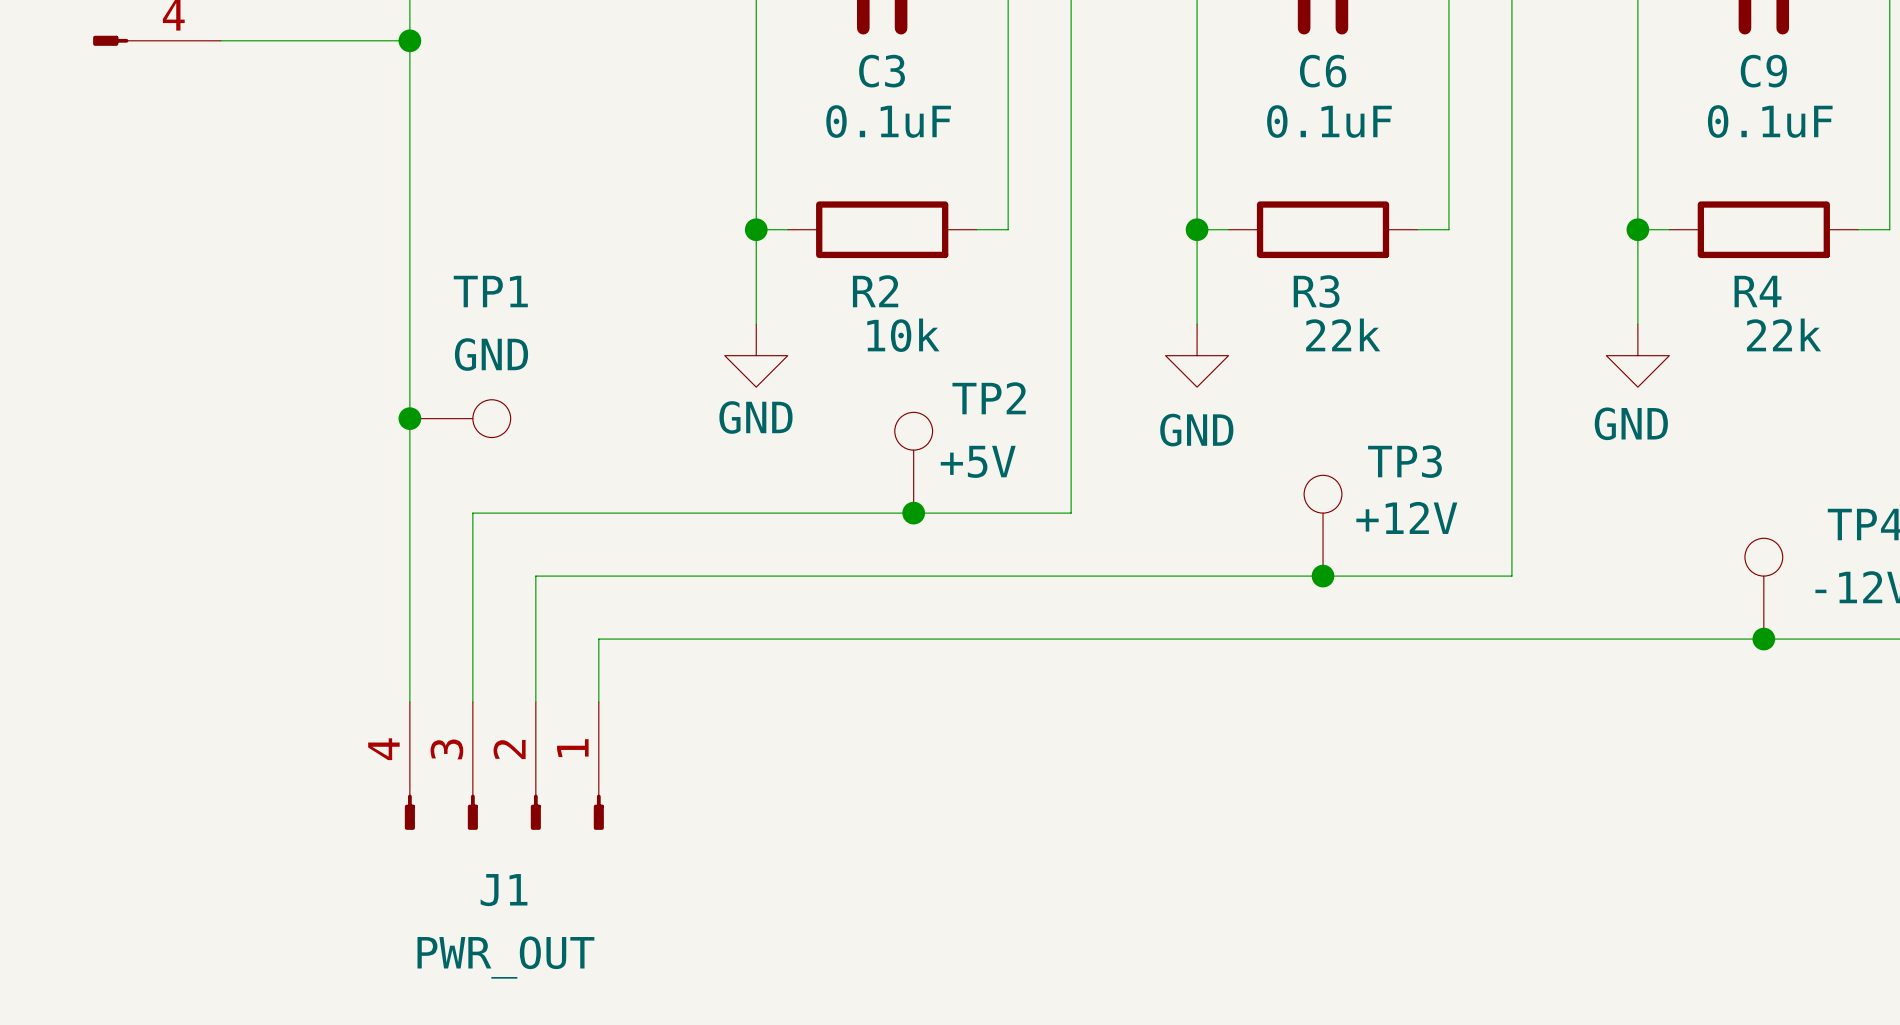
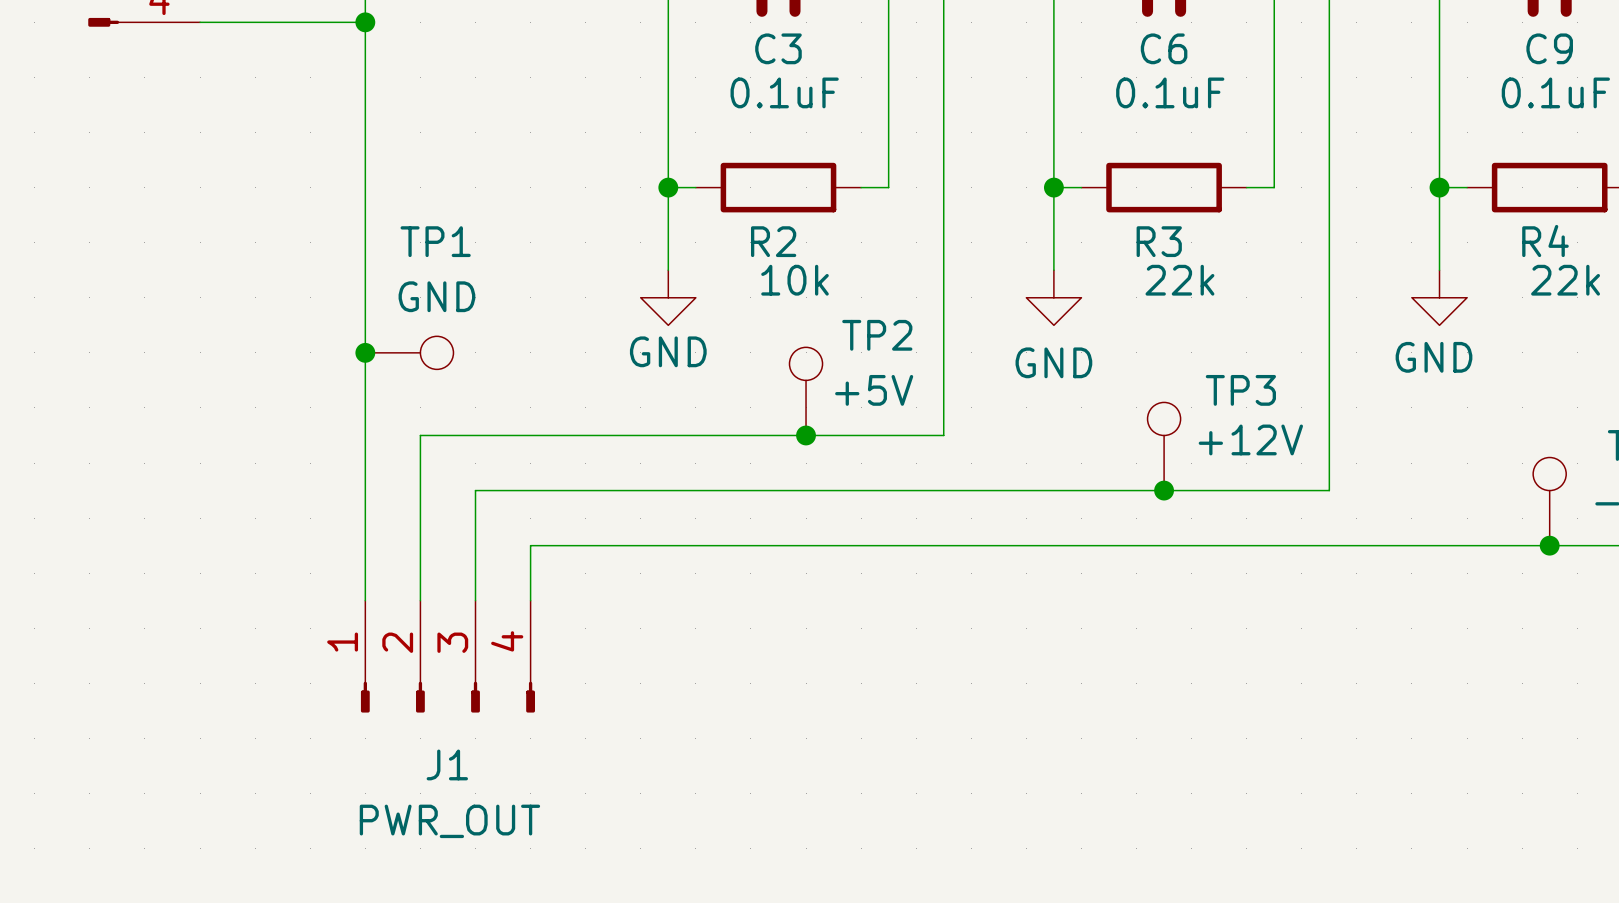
J1 flip: as is (504, 812) -> left-right (447, 697)

